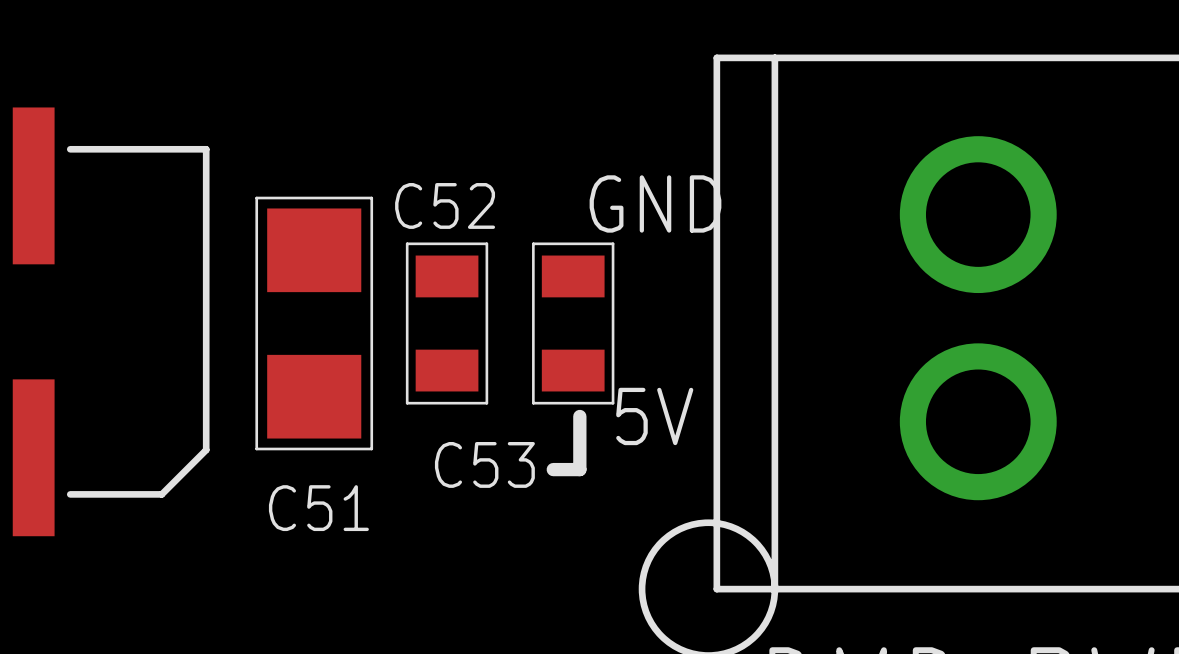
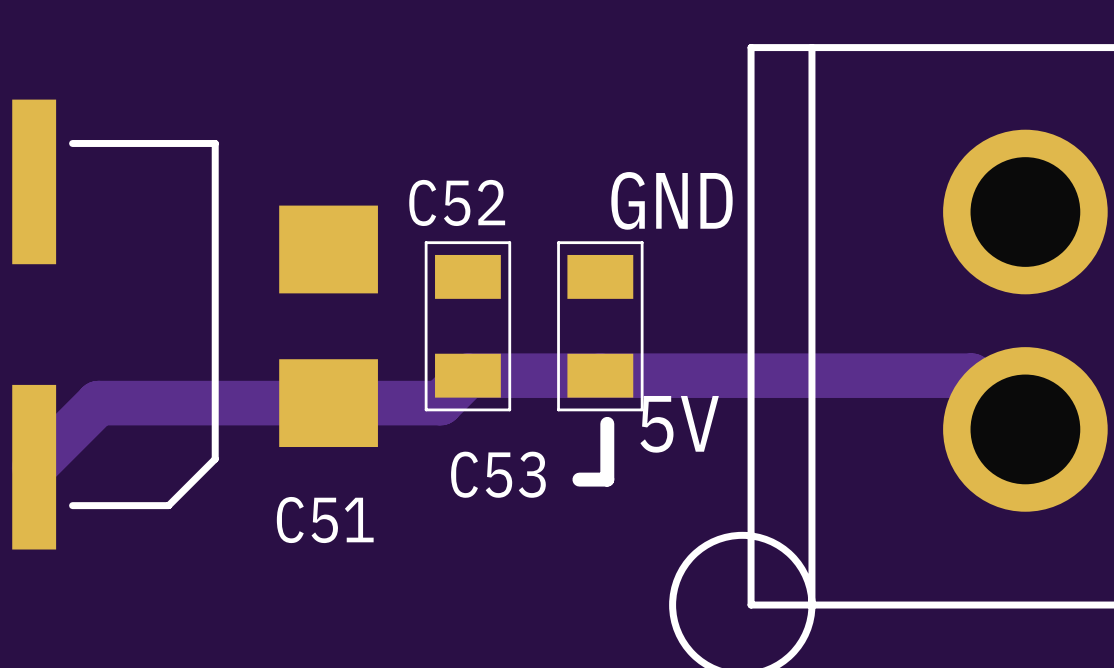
C51 footprint: [255, 196, 374, 451] -> [279, 205, 378, 448]
track: none -> (1025, 429) (971, 375) (467, 375) (440, 403) (98, 403) (34, 467)

